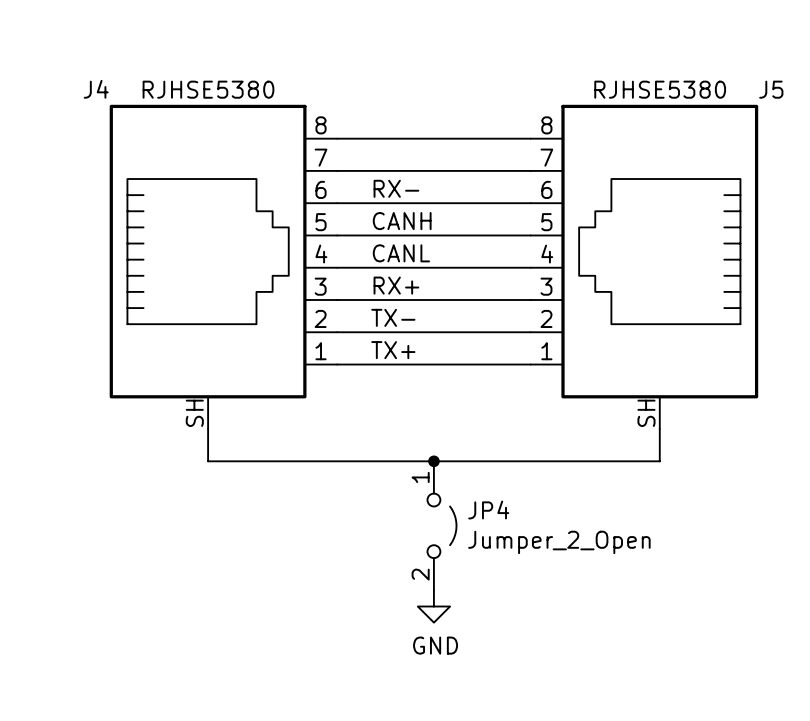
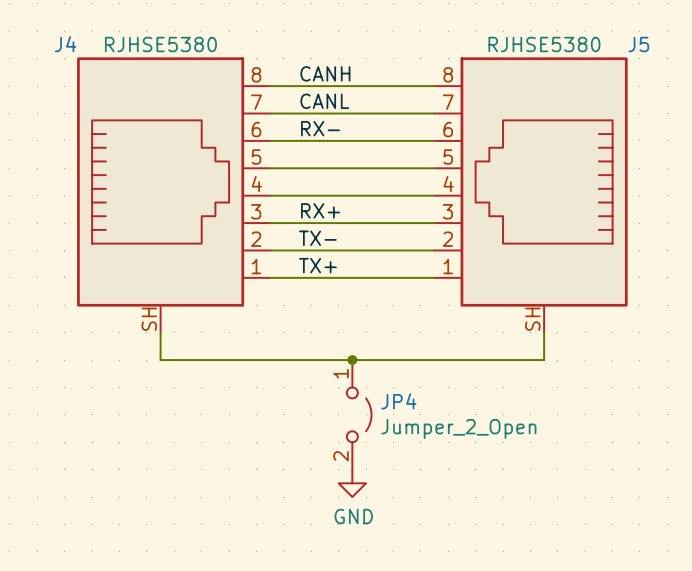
label position: CANH (402, 221) -> CANH (325, 73)
label position: CANL (401, 253) -> CANL (324, 101)

